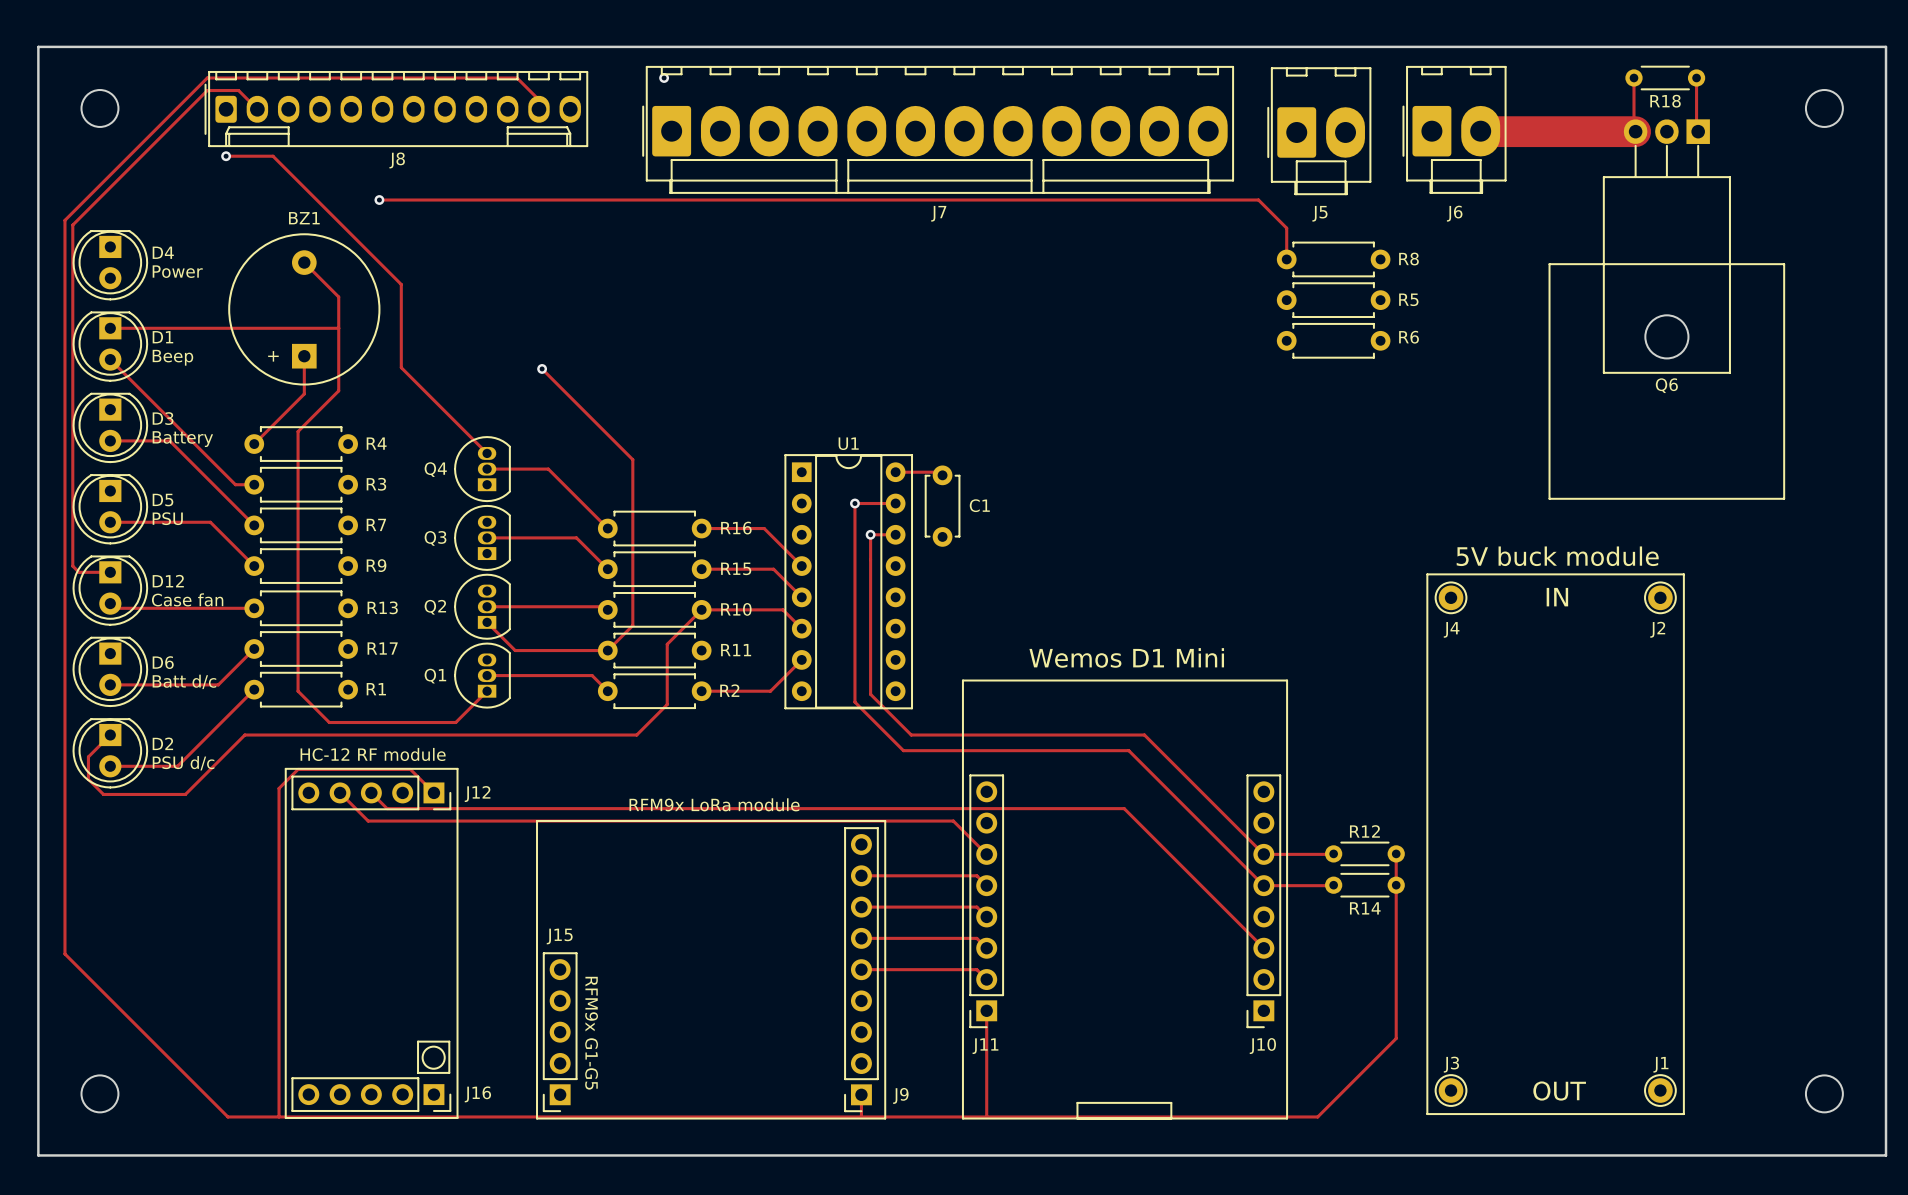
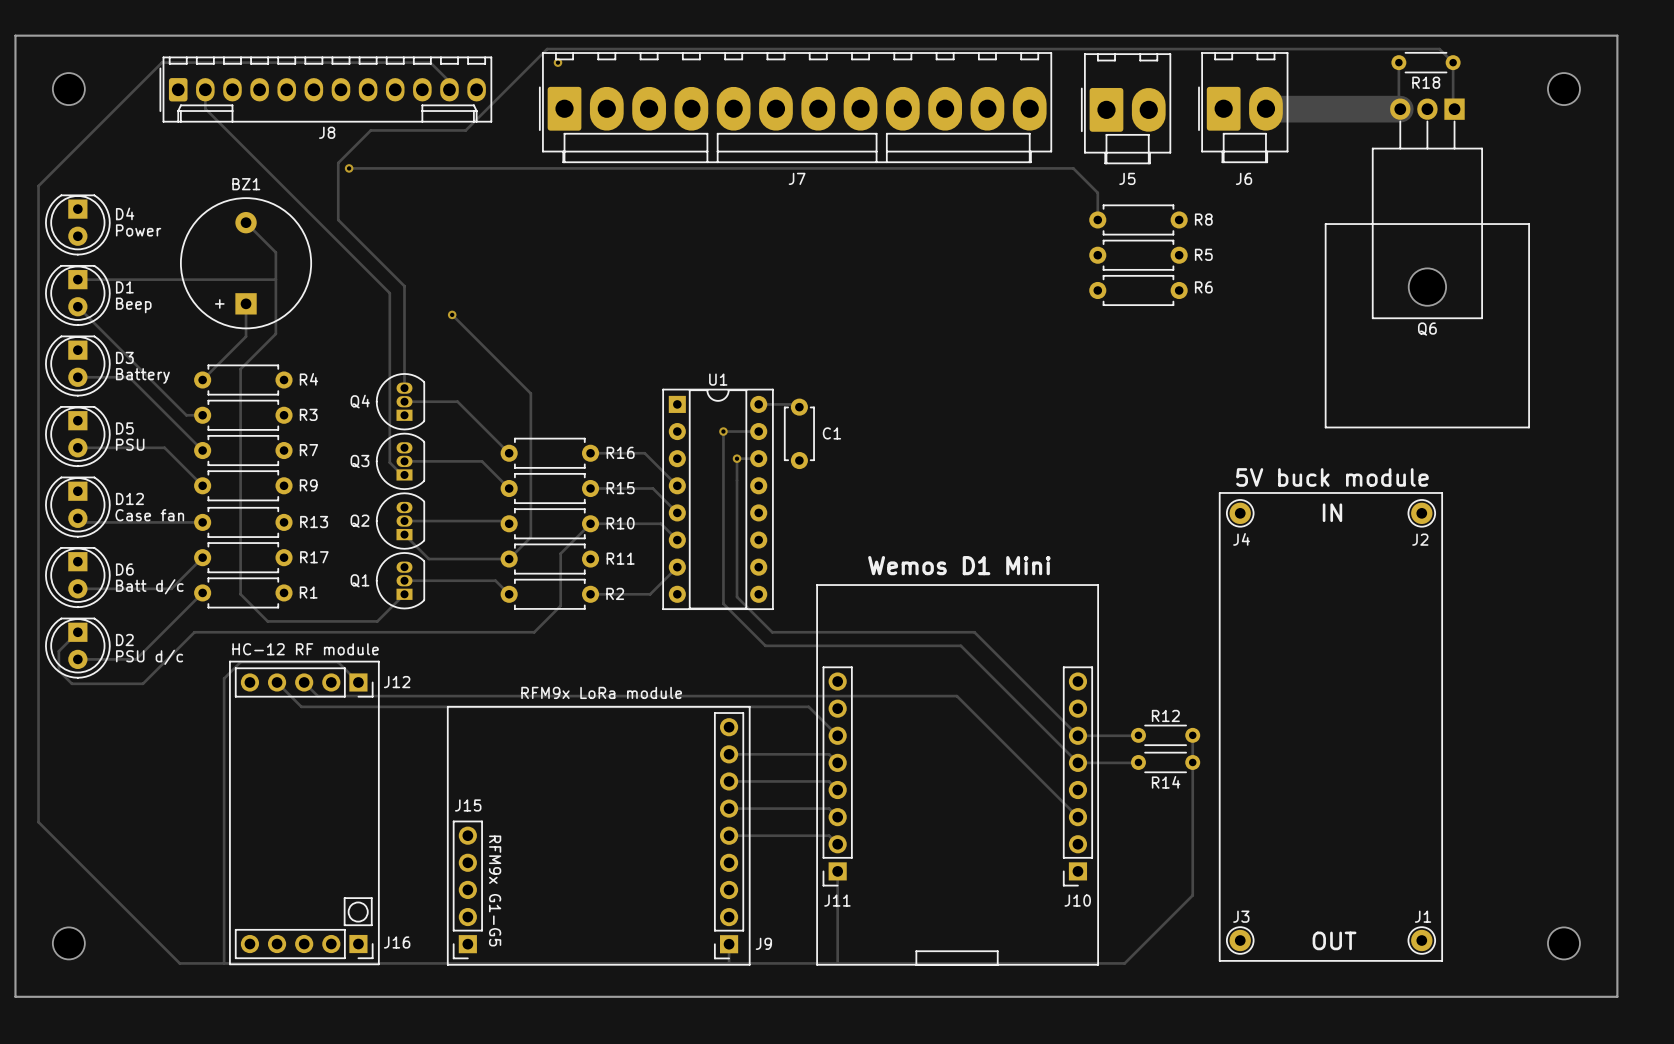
track: (257, 109) (238, 90) (207, 90) (72, 225) (72, 566) (78, 572) (110, 572) -> (205, 89) (205, 108) (389, 293) (389, 462) (402, 474) (404, 474)
track: (226, 156) (273, 156) (401, 284) (401, 367) (487, 453) -> (1453, 62) (1439, 49) (547, 49) (465, 130) (370, 130) (338, 163) (338, 219) (404, 286) (404, 388)
via: (226, 156) -> none
track: (379, 200) (423, 200) -> none
via position: (379, 200) -> (349, 168)

